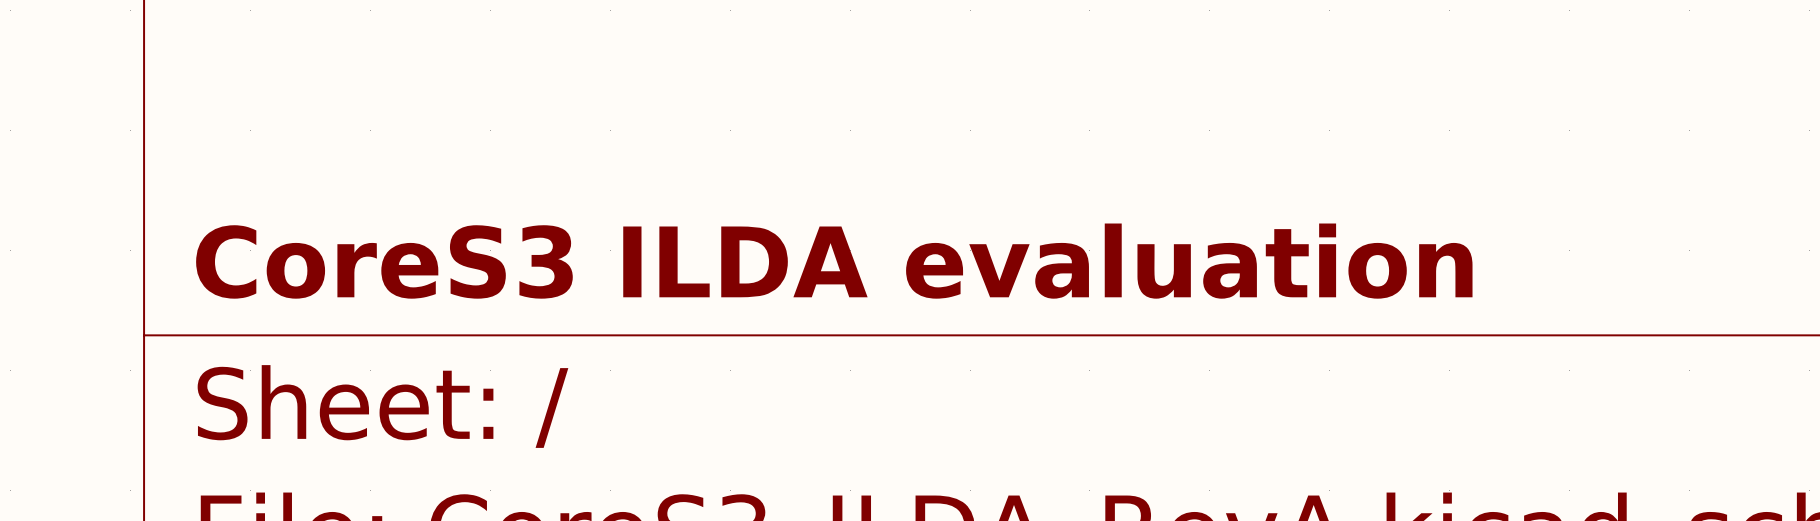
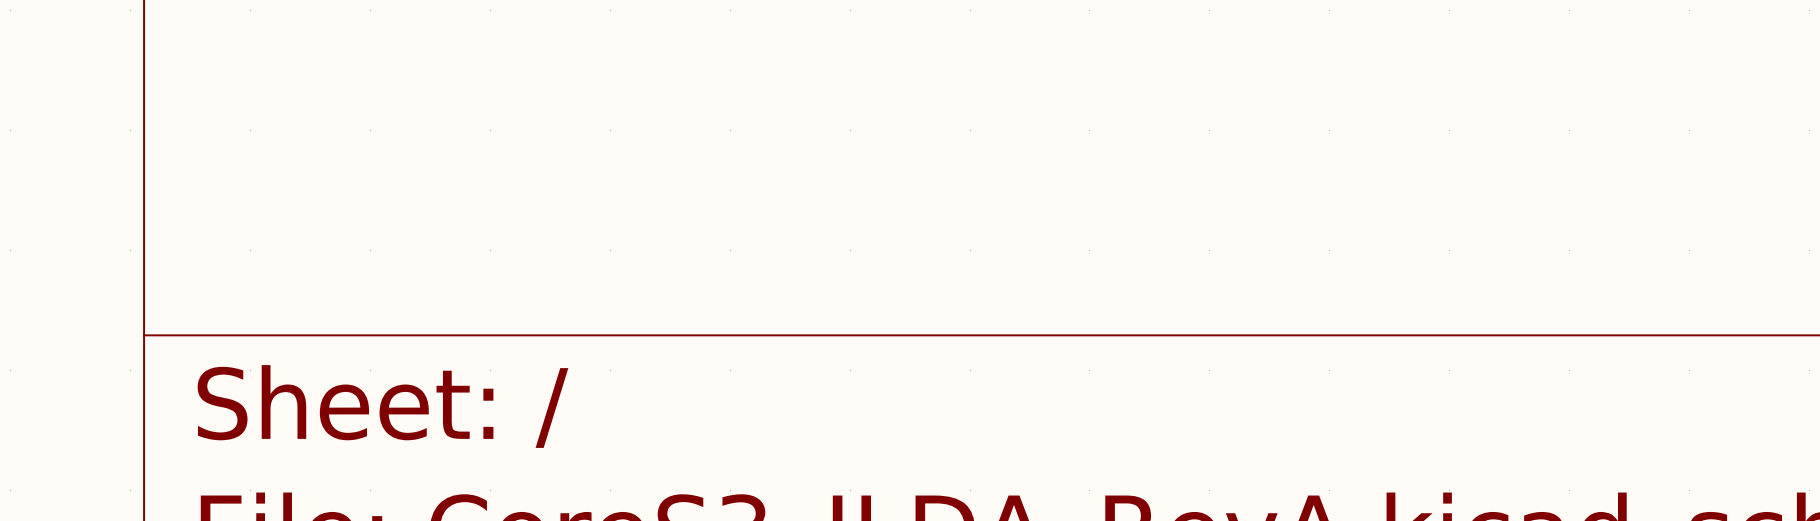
title block: CoreS3 ILDA evaluation (834, 261) -> none

